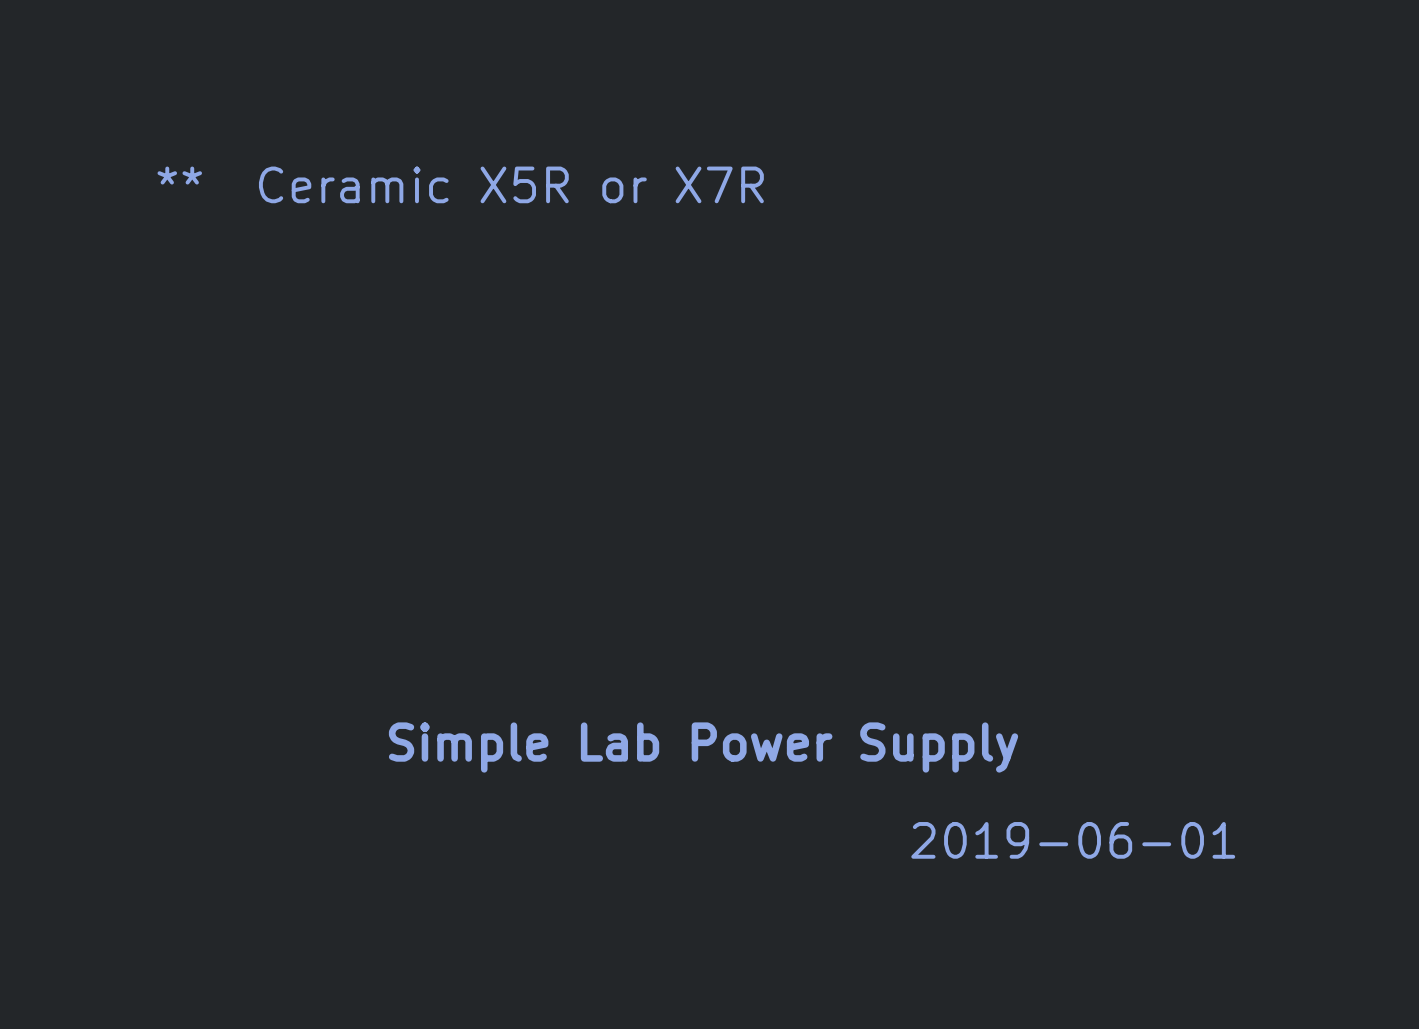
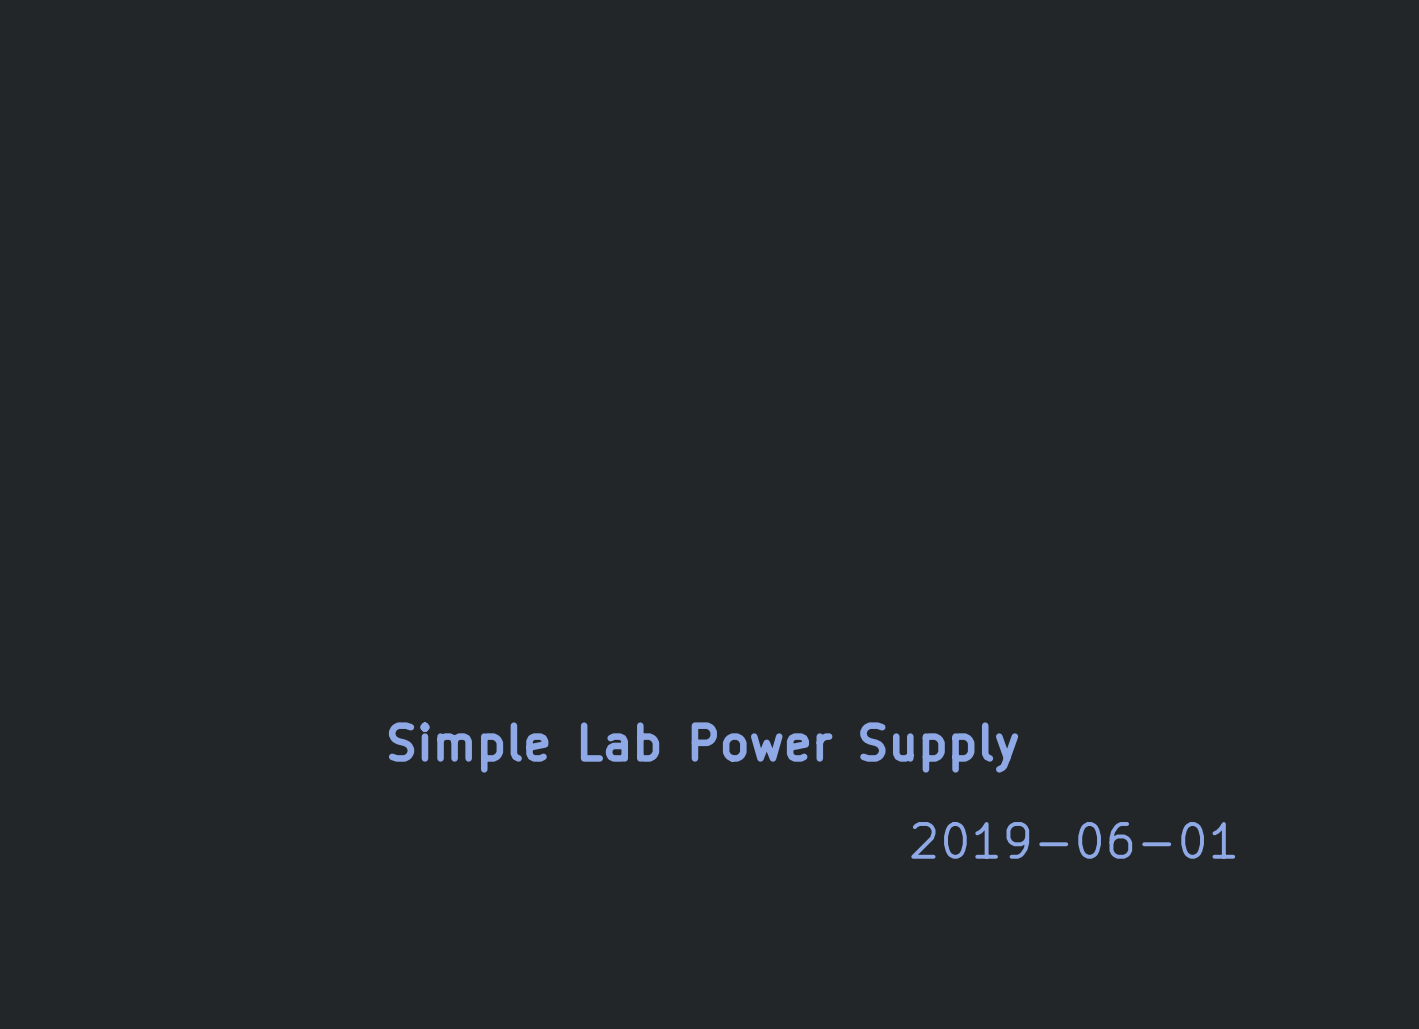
text: ** Ceramic X5R or X7R (460, 184) -> none

